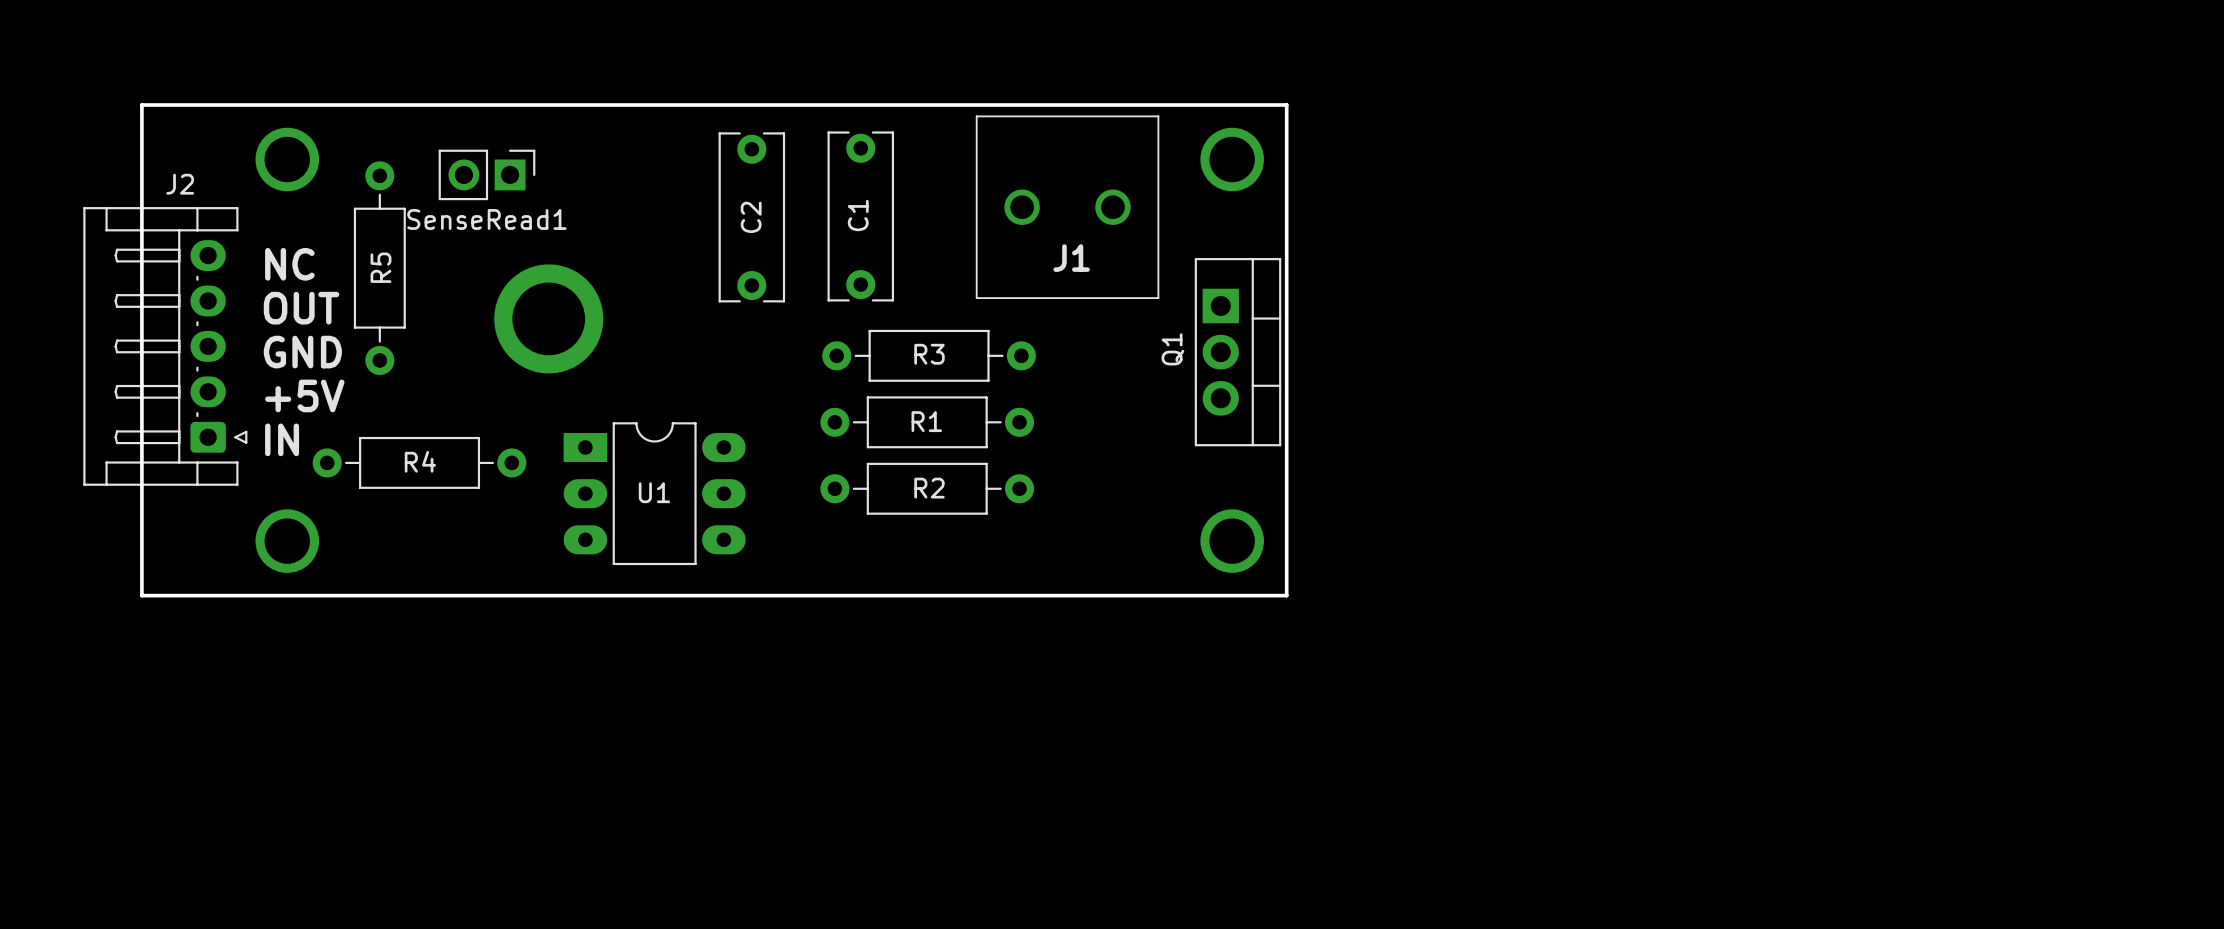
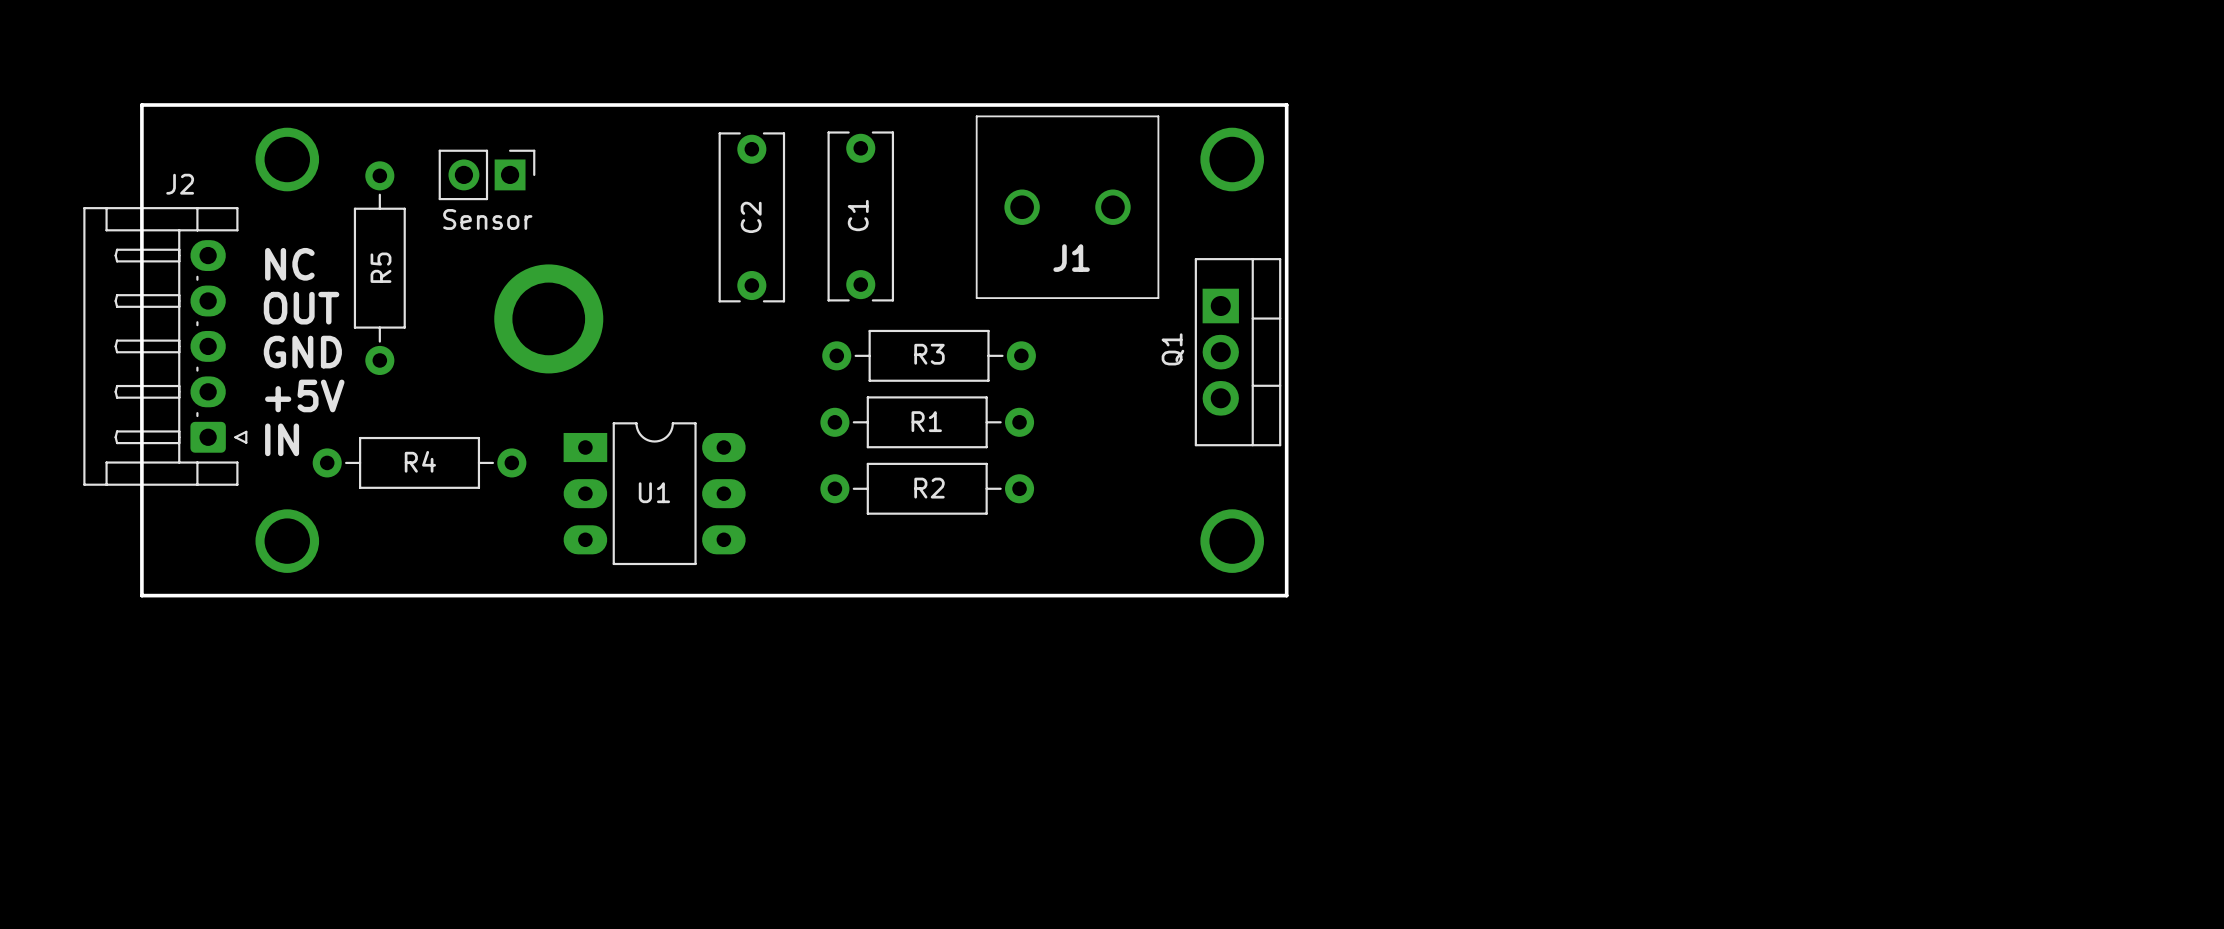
SenseRead1 name: SenseRead1 (486, 219) -> Sensor (487, 219)

